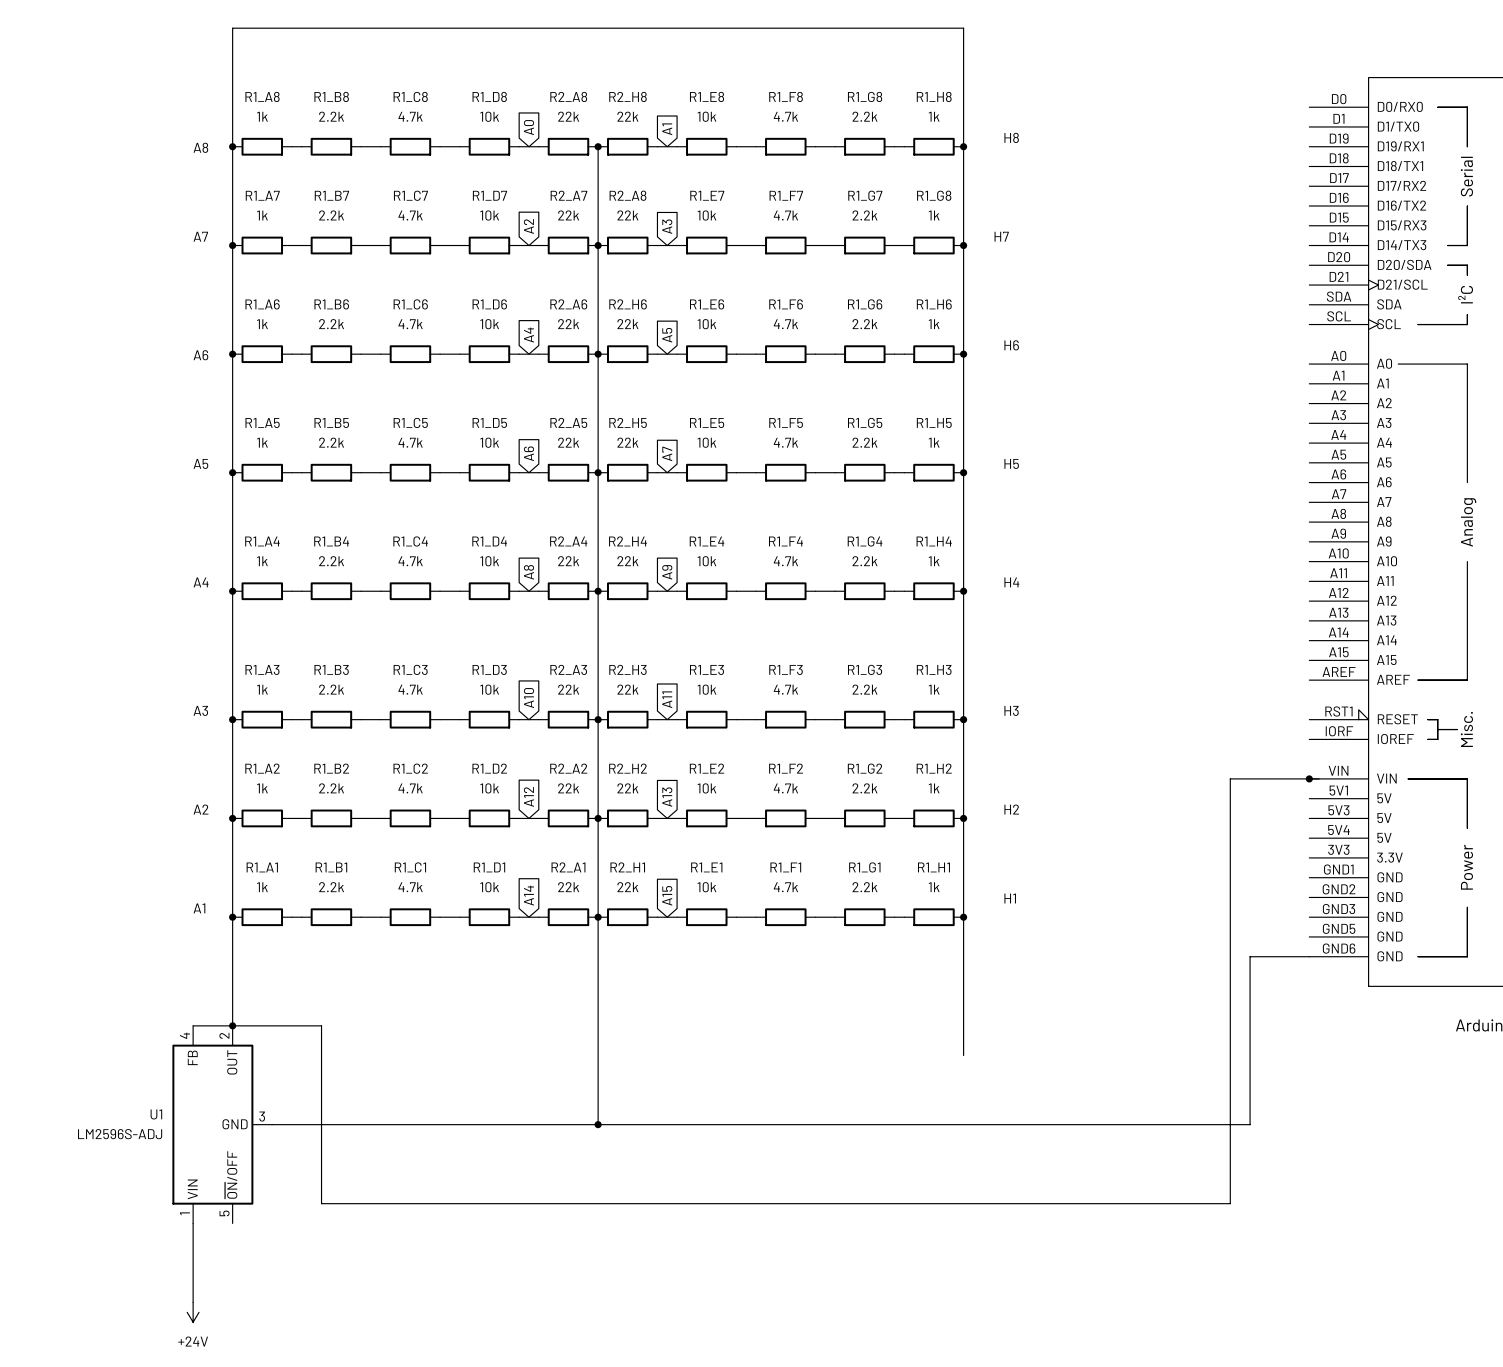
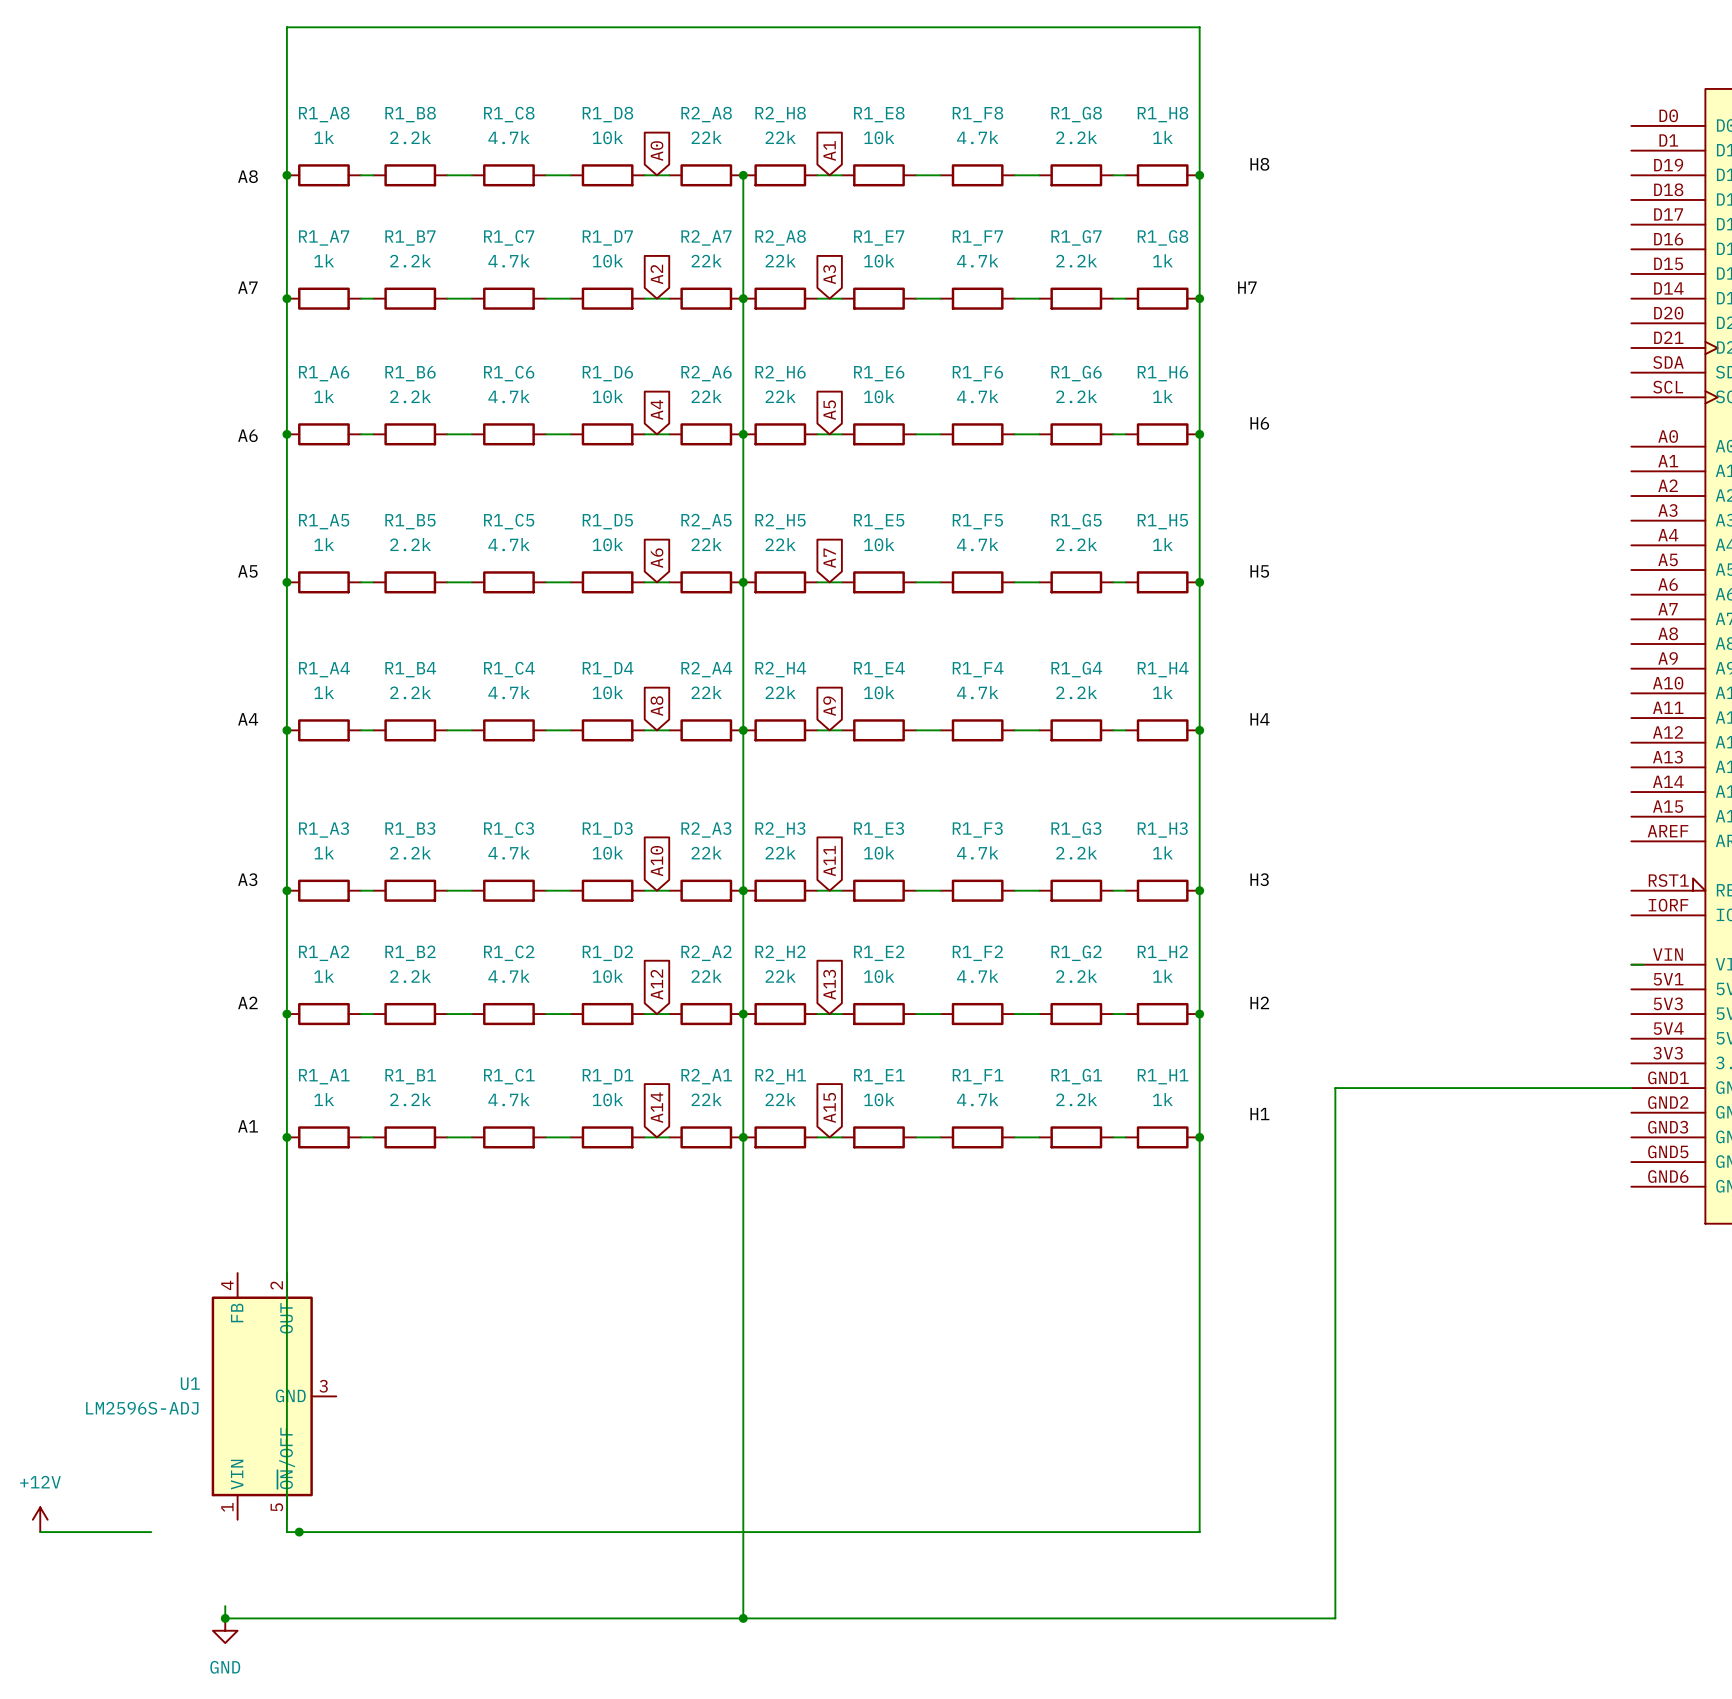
wire: (1309, 778) (1230, 778) (1230, 1203) (321, 1203) (321, 1025) (193, 1025) -> none
junction: (1309, 778) -> none
wire: none -> (1631, 1088) (1335, 1088) (1335, 1618) (225, 1618) (225, 1606)
wire: (1309, 956) (1250, 956) (1250, 1124) (272, 1124) -> none
wire: none -> (286, 1273) (286, 1532) (1199, 1532) (1199, 1310)
junction: (232, 1025) -> none
wire: none -> (743, 1396) (743, 1618)
junction: (598, 1124) -> none
power symbol: none -> +12V (40, 1519)
wire: (193, 1223) (193, 1302) -> none
wire: none -> (40, 1532) (151, 1532)
junction: none -> (299, 1532)
junction: none -> (225, 1618)
junction: none -> (743, 1618)
power symbol: none -> GND (225, 1630)
power symbol: +24V (193, 1312) -> none

